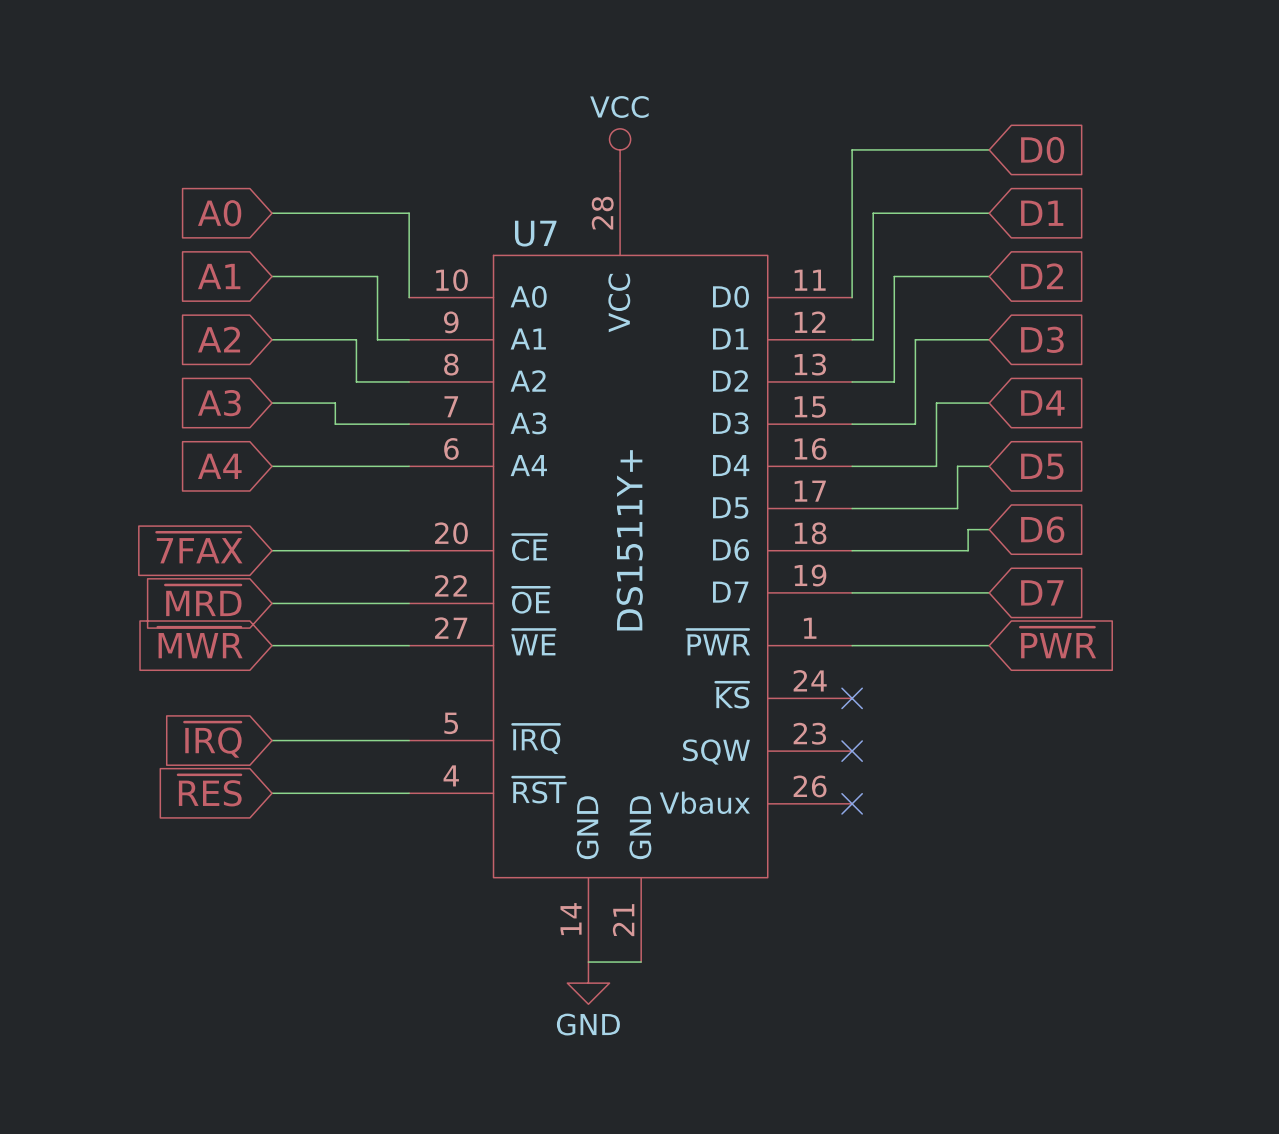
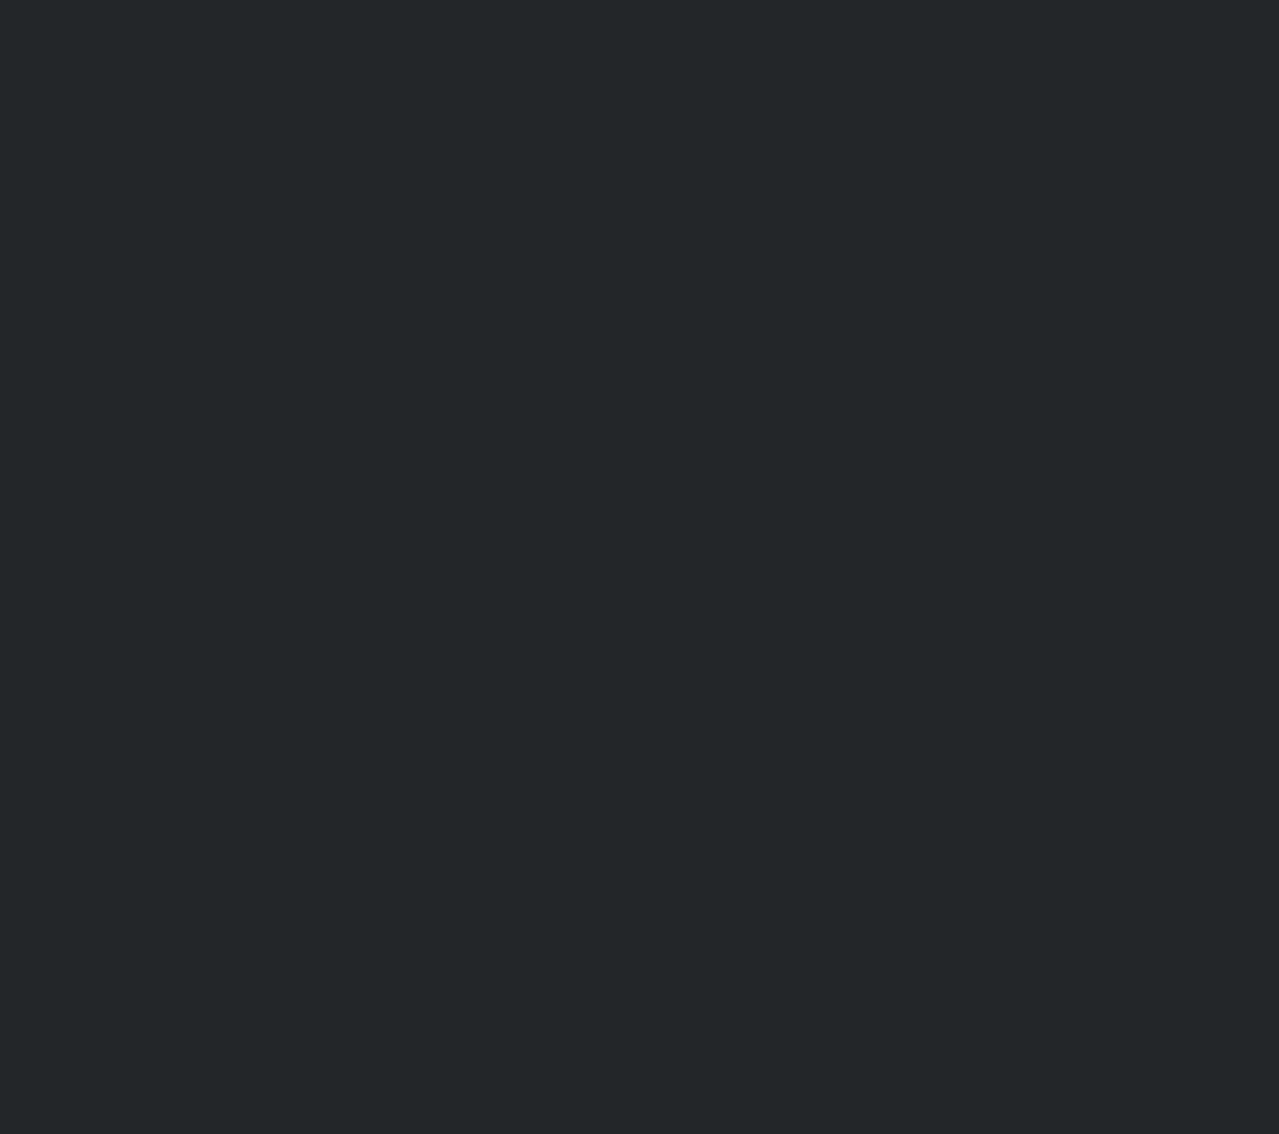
power symbol: VCC (620, 149) -> none
wire: (989, 149) (852, 149) (852, 297) -> none
global label: D0 (1042, 149) -> none
global label: A0 (219, 213) -> none
wire: (272, 213) (409, 213) (409, 297) -> none
wire: (989, 213) (873, 213) (873, 339) (852, 339) -> none
global label: D1 (1042, 213) -> none
global label: A1 (219, 276) -> none
wire: (272, 276) (377, 276) (377, 339) (409, 339) -> none
wire: (989, 276) (894, 276) (894, 381) (852, 381) -> none
global label: D2 (1042, 276) -> none
global label: A2 (219, 339) -> none
wire: (272, 339) (356, 339) (356, 381) (409, 381) -> none
wire: (989, 339) (915, 339) (915, 424) (852, 424) -> none
global label: D3 (1042, 339) -> none
global label: A3 (219, 403) -> none
wire: (272, 403) (335, 403) (335, 424) (409, 424) -> none
wire: (989, 403) (936, 403) (936, 466) (852, 466) -> none
global label: D4 (1042, 403) -> none
global label: A4 (219, 466) -> none
wire: (272, 466) (409, 466) -> none
wire: (989, 466) (957, 466) (957, 508) (852, 508) -> none
global label: D5 (1042, 466) -> none
wire: (989, 529) (968, 529) (968, 550) (852, 550) -> none
global label: D6 (1042, 529) -> none
global label: ~{7FAX} (199, 547) -> none
wire: (272, 550) (409, 550) -> none
U7: DS1511Y+ (630, 566) -> none
wire: (852, 592) (989, 592) -> none
global label: D7 (1042, 592) -> none
global label: ~{MRD} (203, 600) -> none
wire: (272, 603) (409, 603) -> none
global label: ~{MWR} (200, 642) -> none
global label: ~{PWR} (1058, 642) -> none
wire: (272, 645) (409, 645) -> none
wire: (852, 645) (989, 645) -> none
no-connect mark: (852, 698) -> none
global label: ~{IRQ} (213, 739) -> none
wire: (272, 740) (409, 740) -> none
no-connect mark: (852, 751) -> none
global label: ~{RES} (209, 790) -> none
wire: (272, 793) (409, 793) -> none
no-connect mark: (852, 803) -> none
wire: (588, 962) (641, 962) -> none
power symbol: GND (588, 983) -> none

